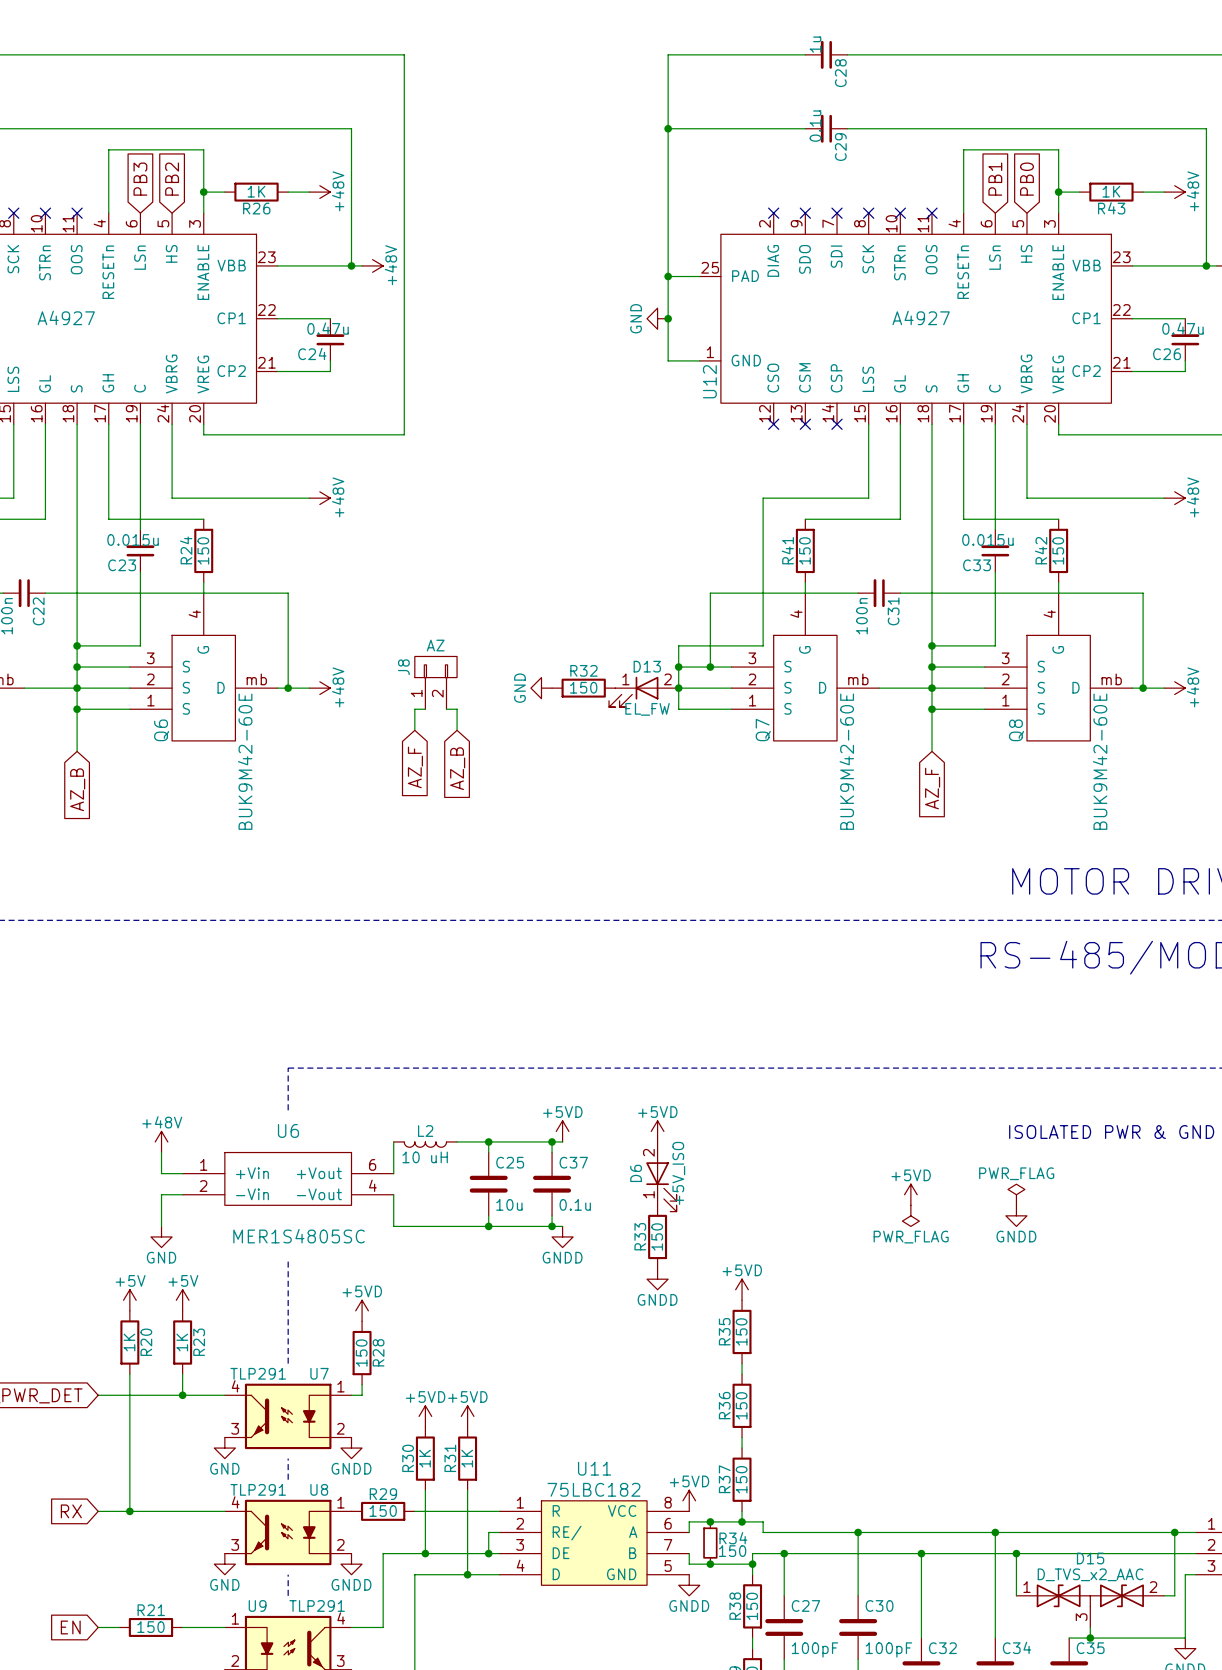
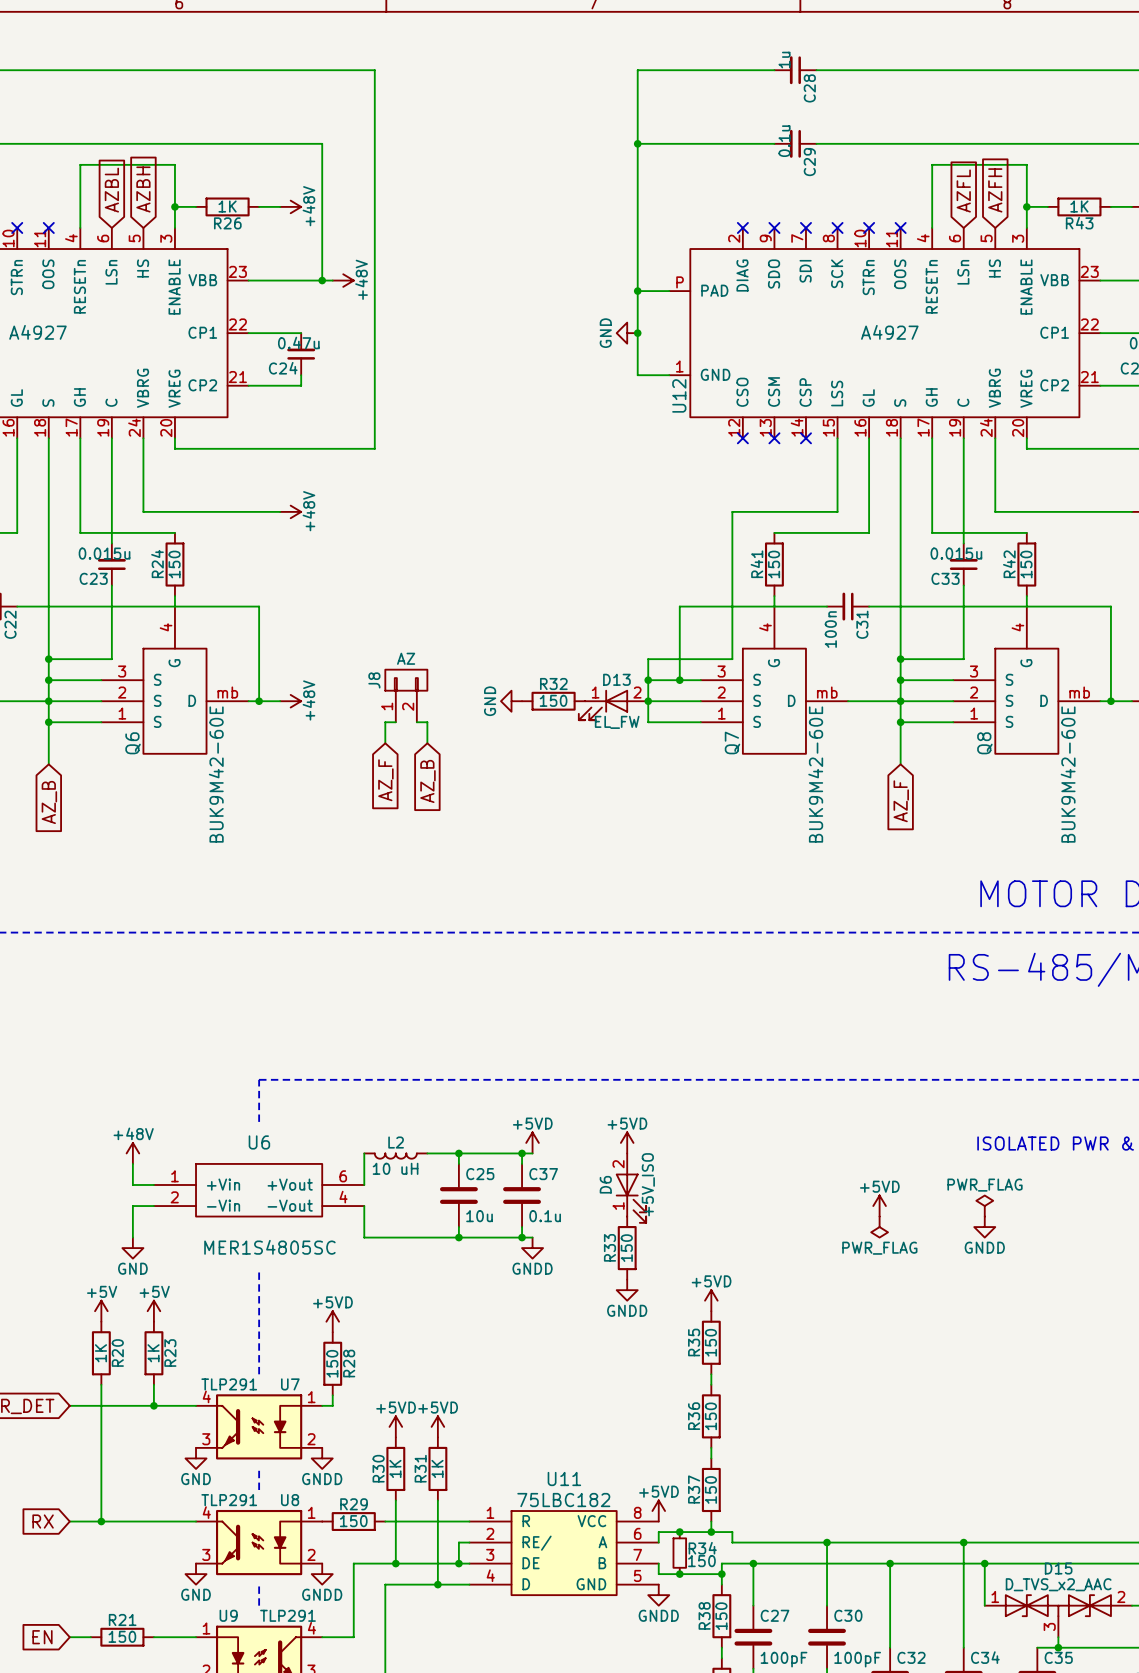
global label: PB3 (140, 179) -> AZBL (111, 190)
global label: PB2 (172, 179) -> AZBH (143, 189)
global label: PB1 (995, 179) -> AZFL (963, 191)
global label: PB0 (1026, 179) -> AZFH (995, 190)
U12 pin number: 25 (710, 267) -> P (680, 282)

